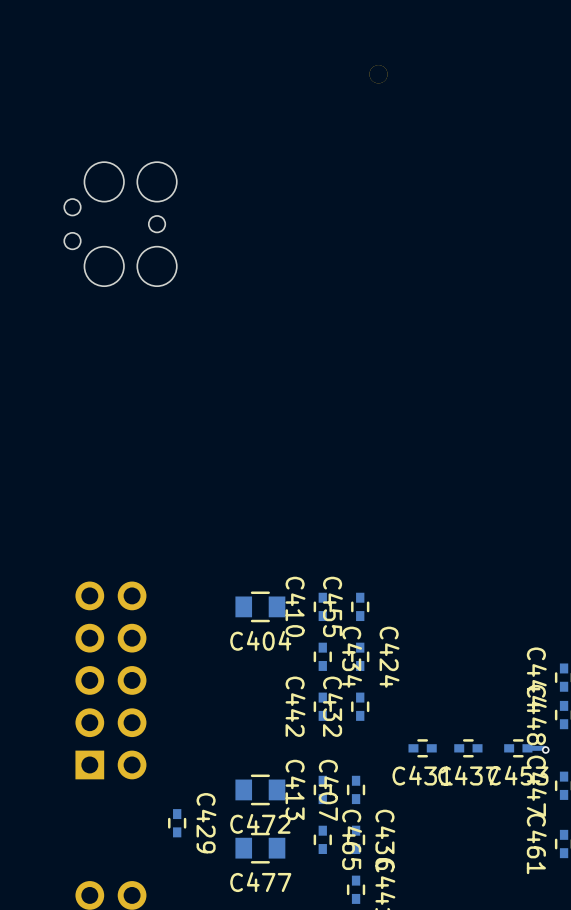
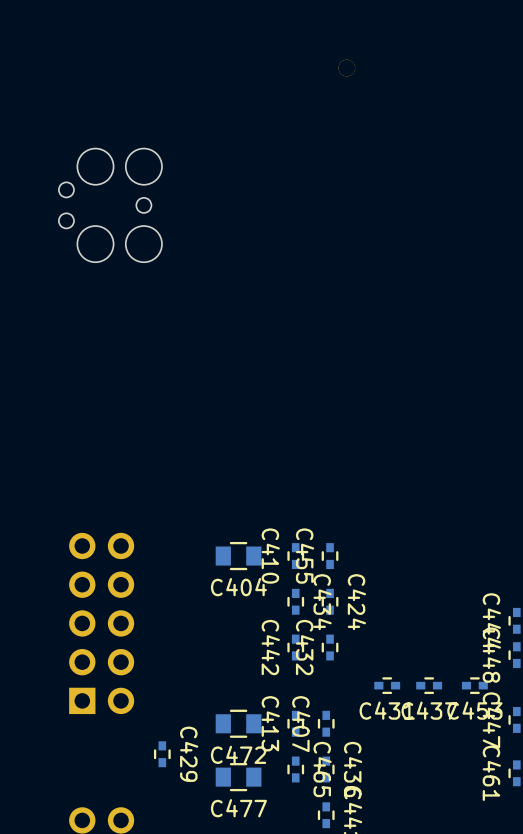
track: (527, 748) (544, 748) (545, 749) -> none
via: (545, 749) -> none

